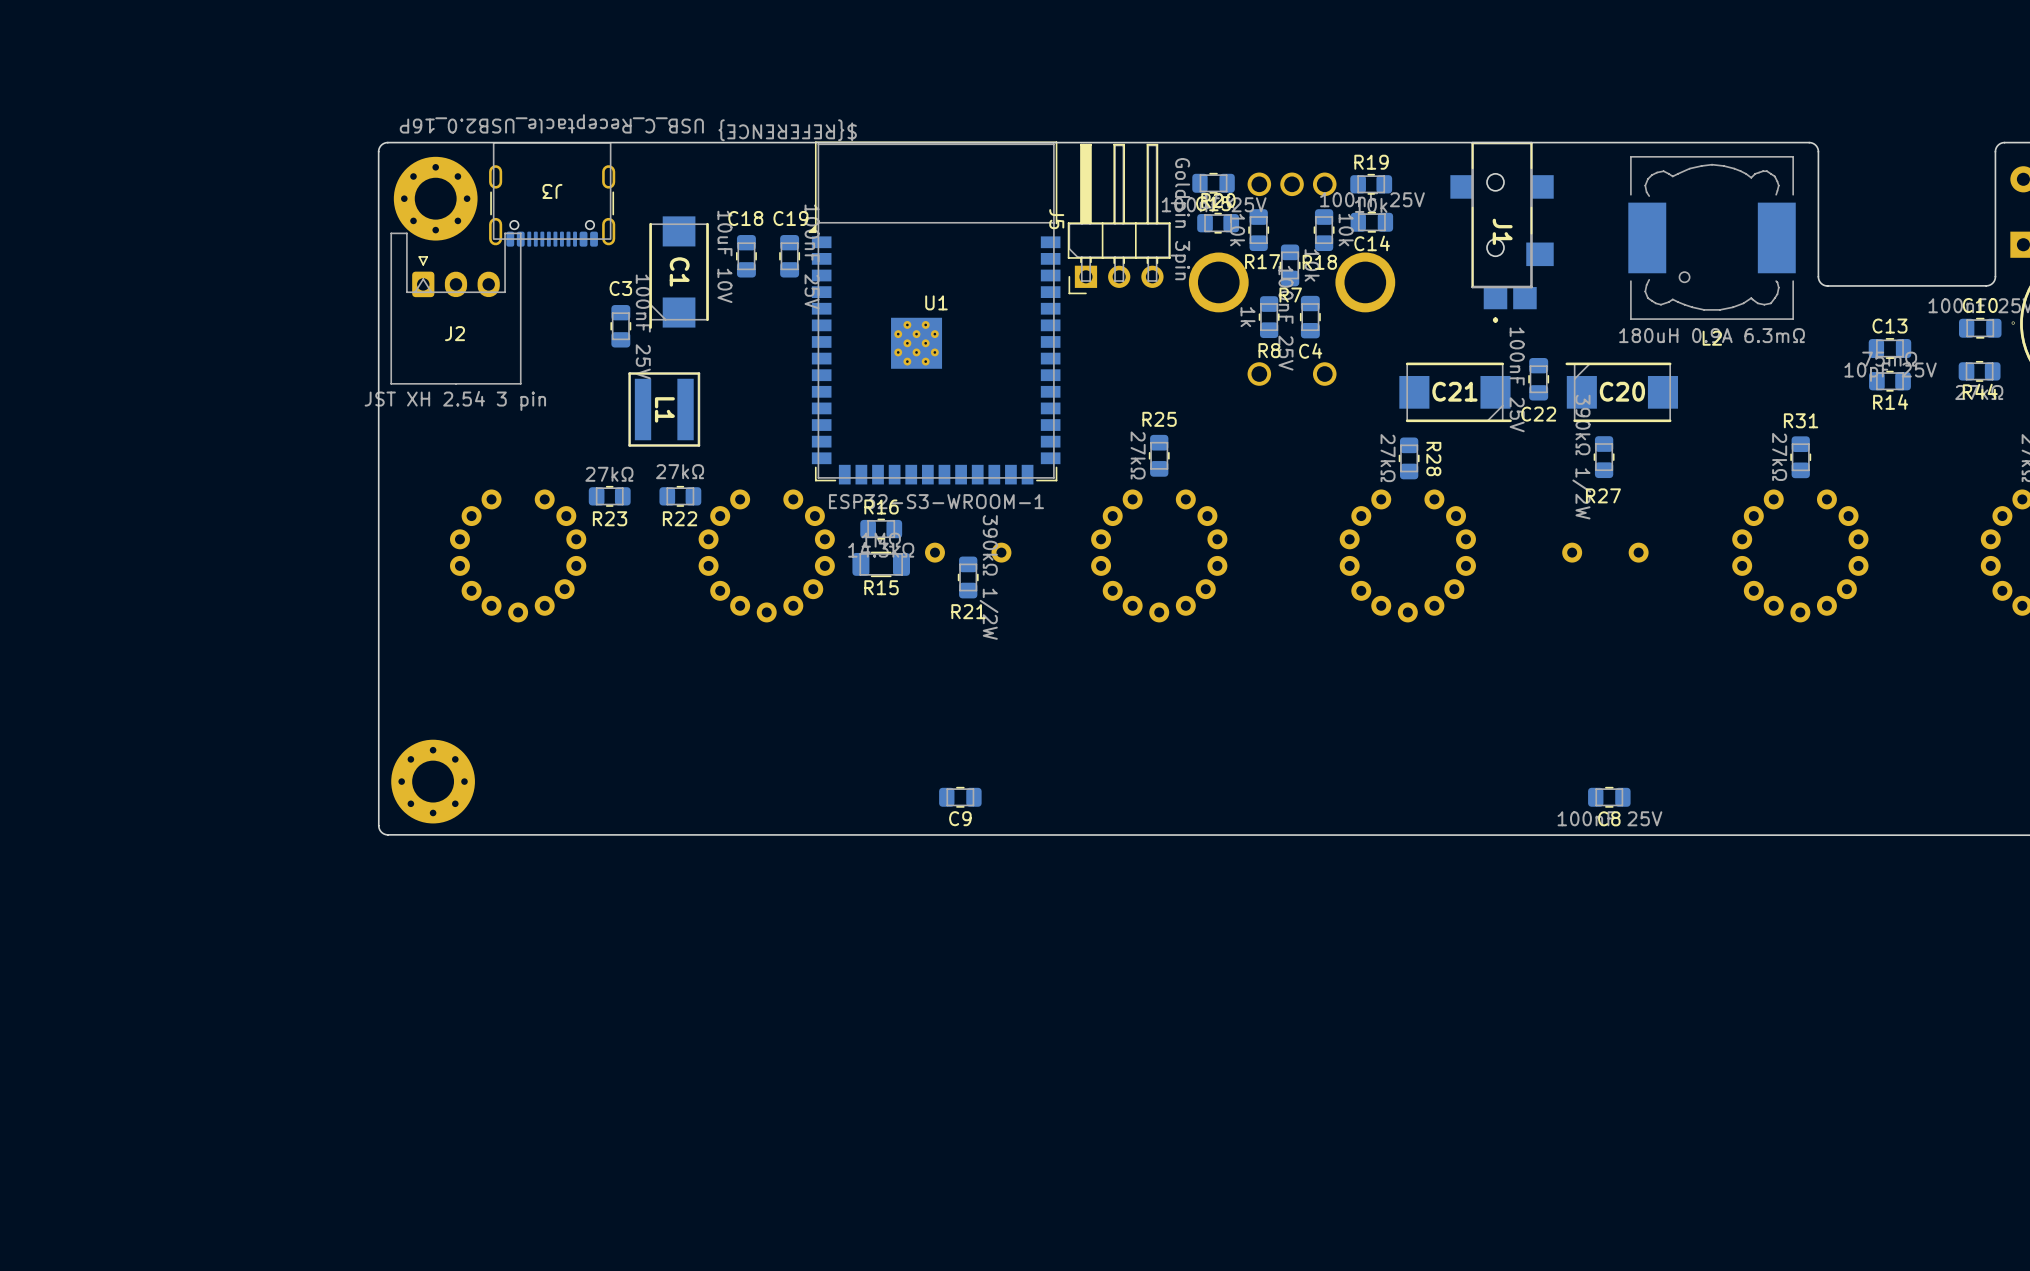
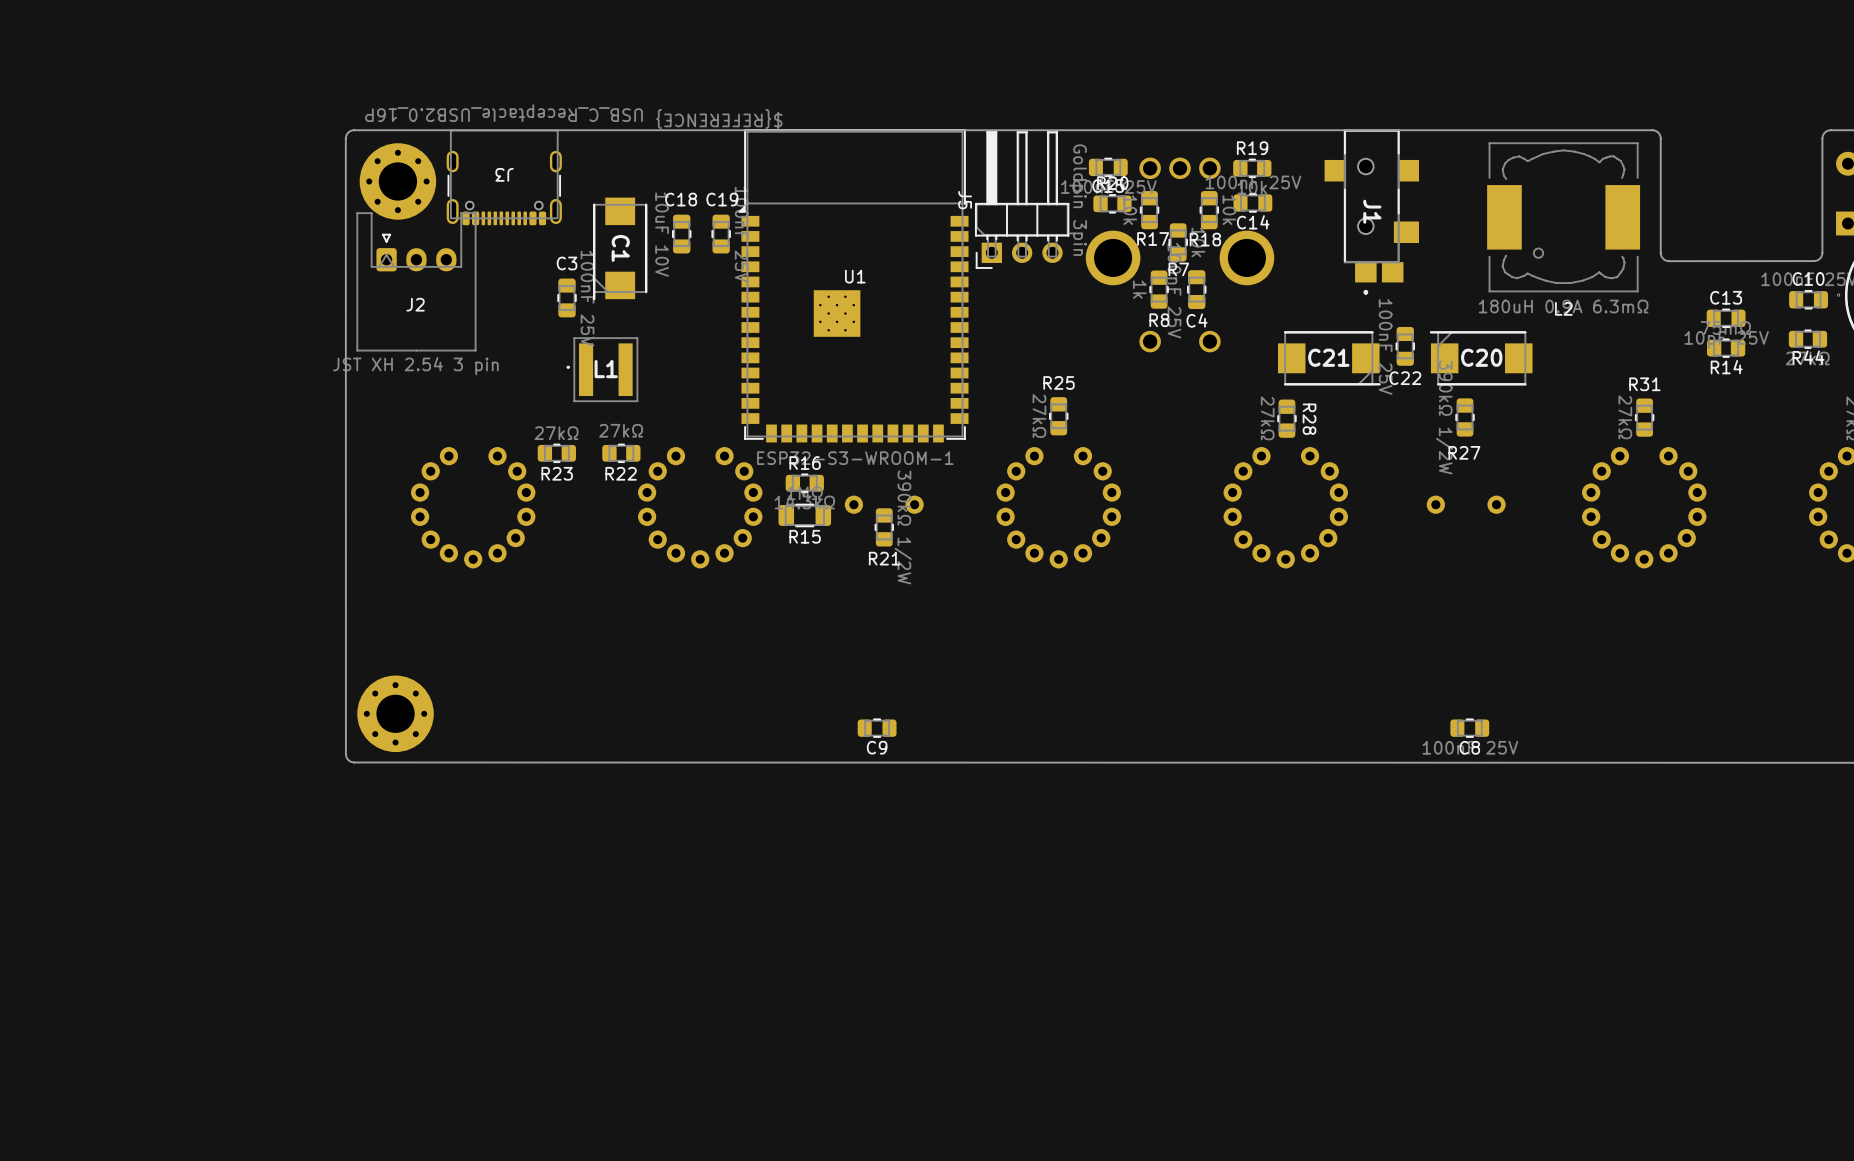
L1 footprint: [628, 372, 701, 447] -> [567, 337, 638, 402]

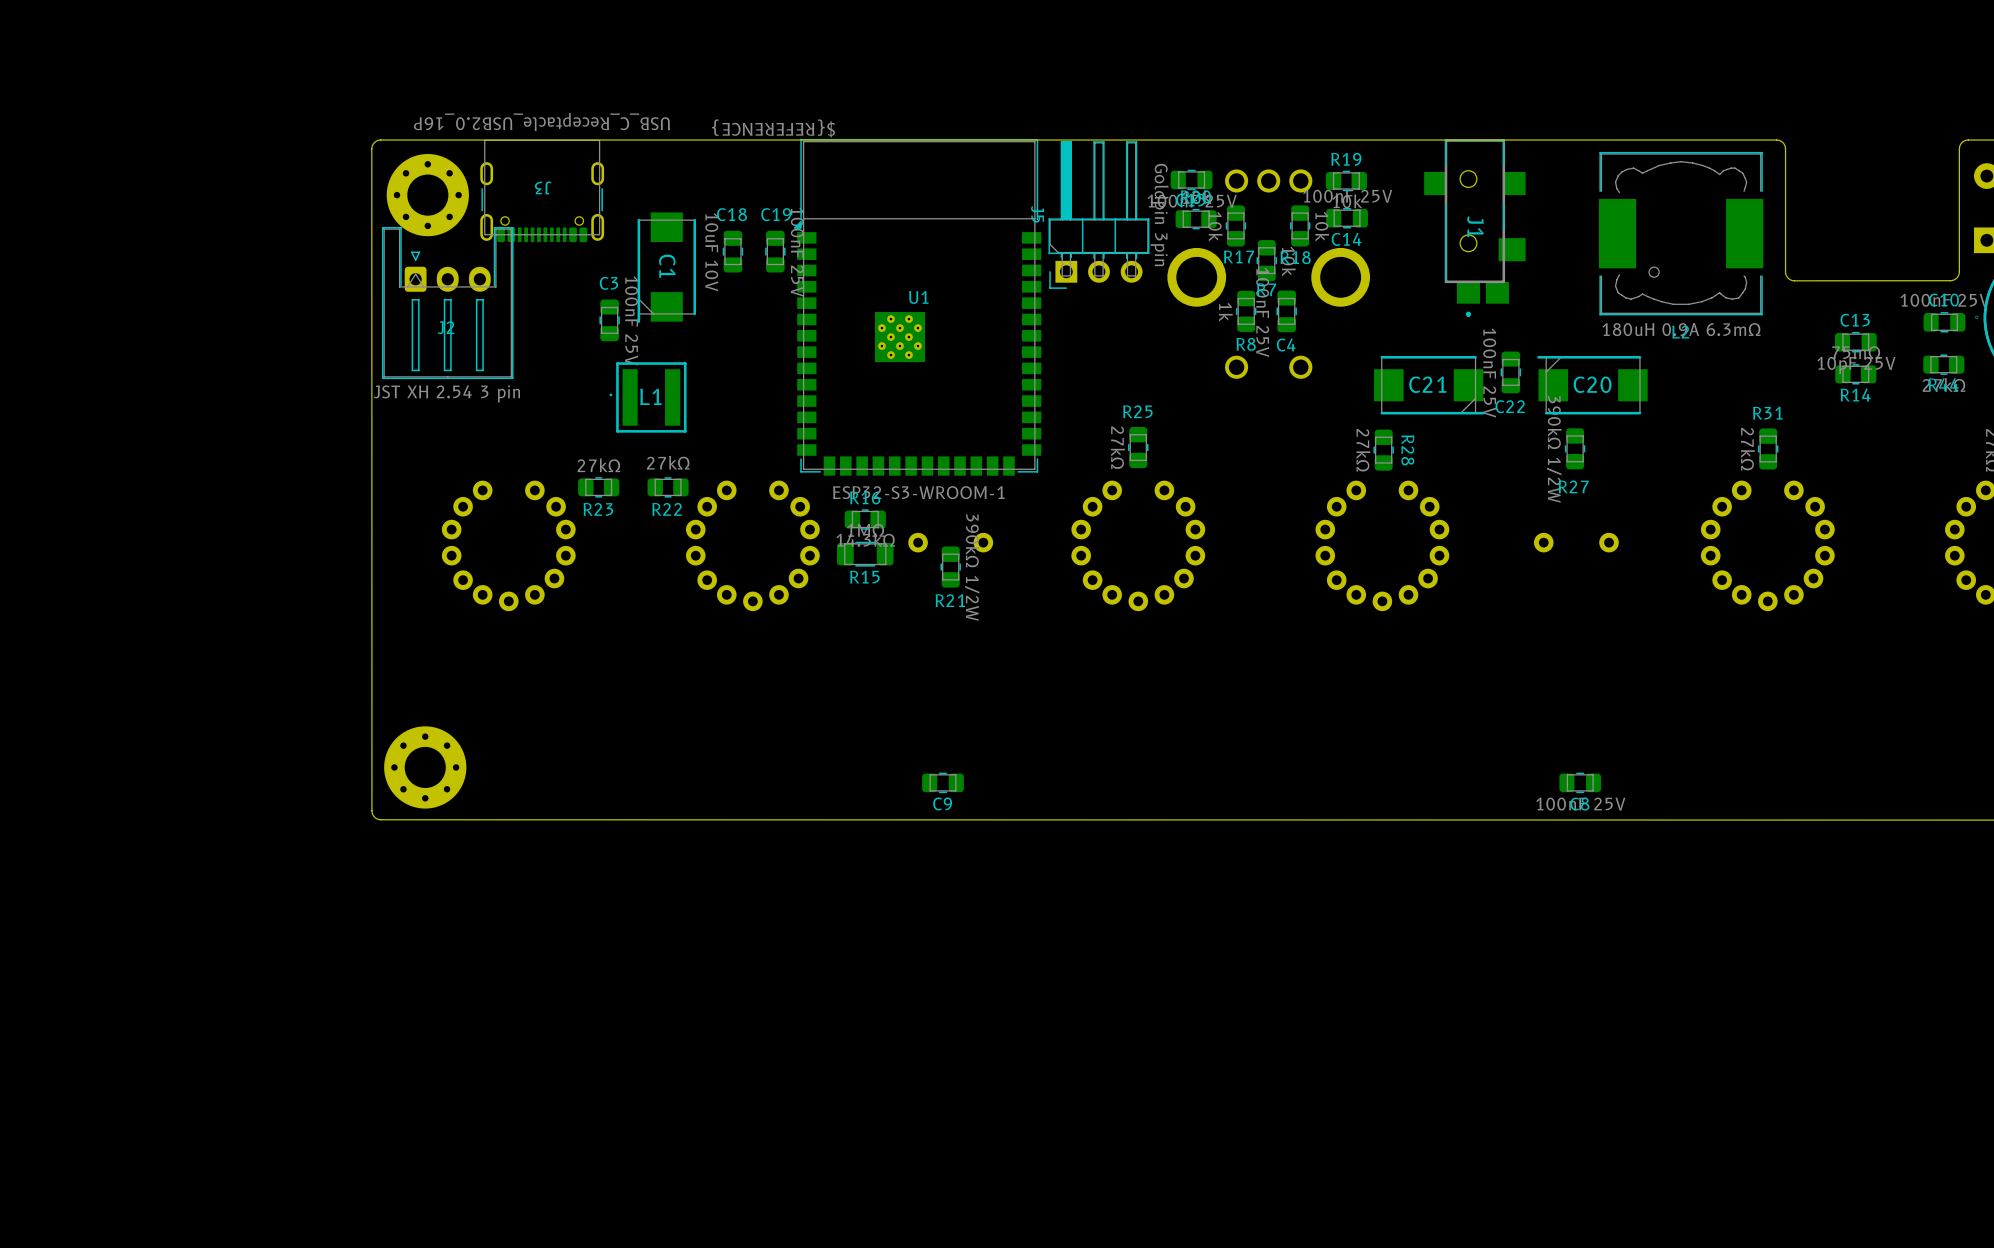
L2 footprint: [1487, 142, 1641, 293] -> [1598, 151, 1764, 316]
J2 footprint: [356, 212, 477, 352] -> [381, 226, 514, 380]
L1 footprint: [567, 337, 638, 402] -> [609, 362, 687, 433]

